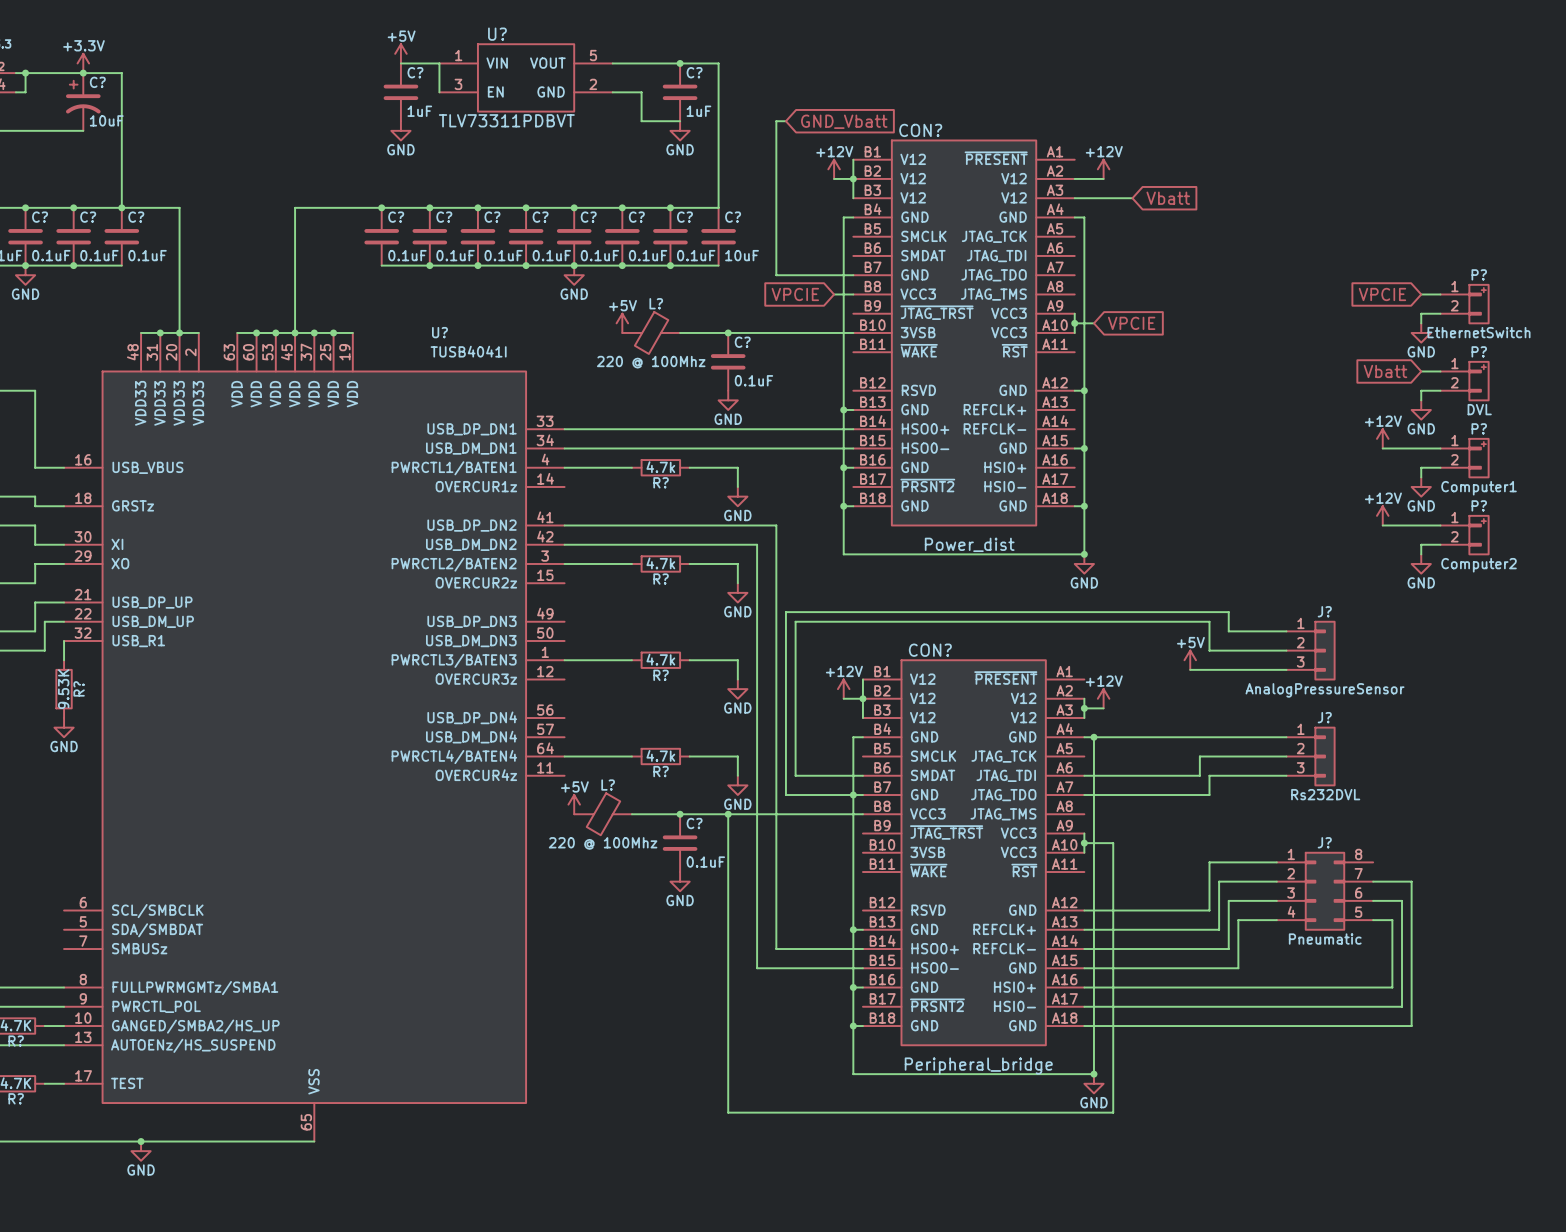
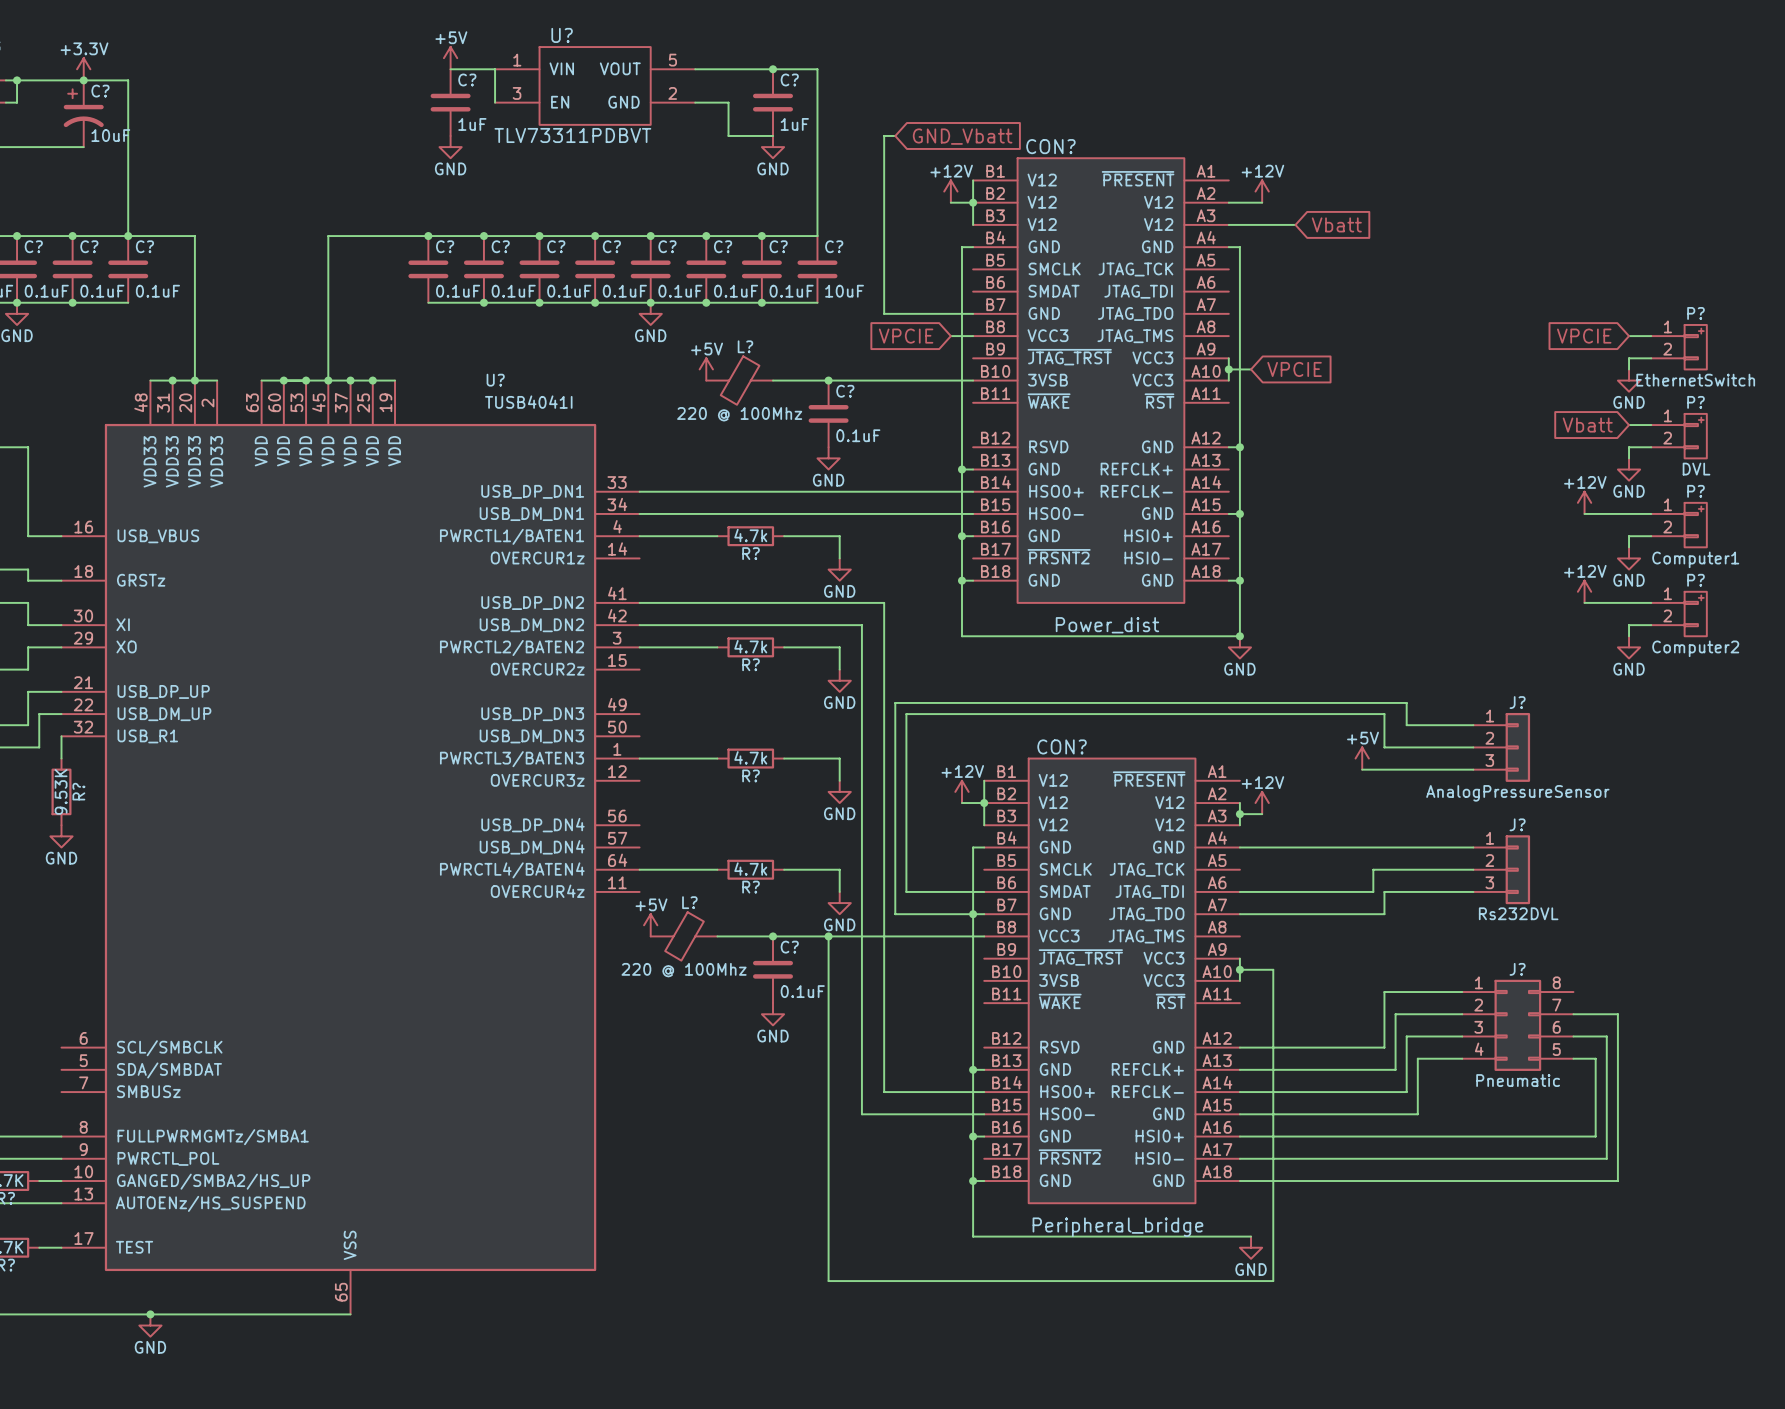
wire: (1093, 737) (1093, 1074) -> none
junction: (1093, 737) -> none
junction: (1093, 1074) -> none

